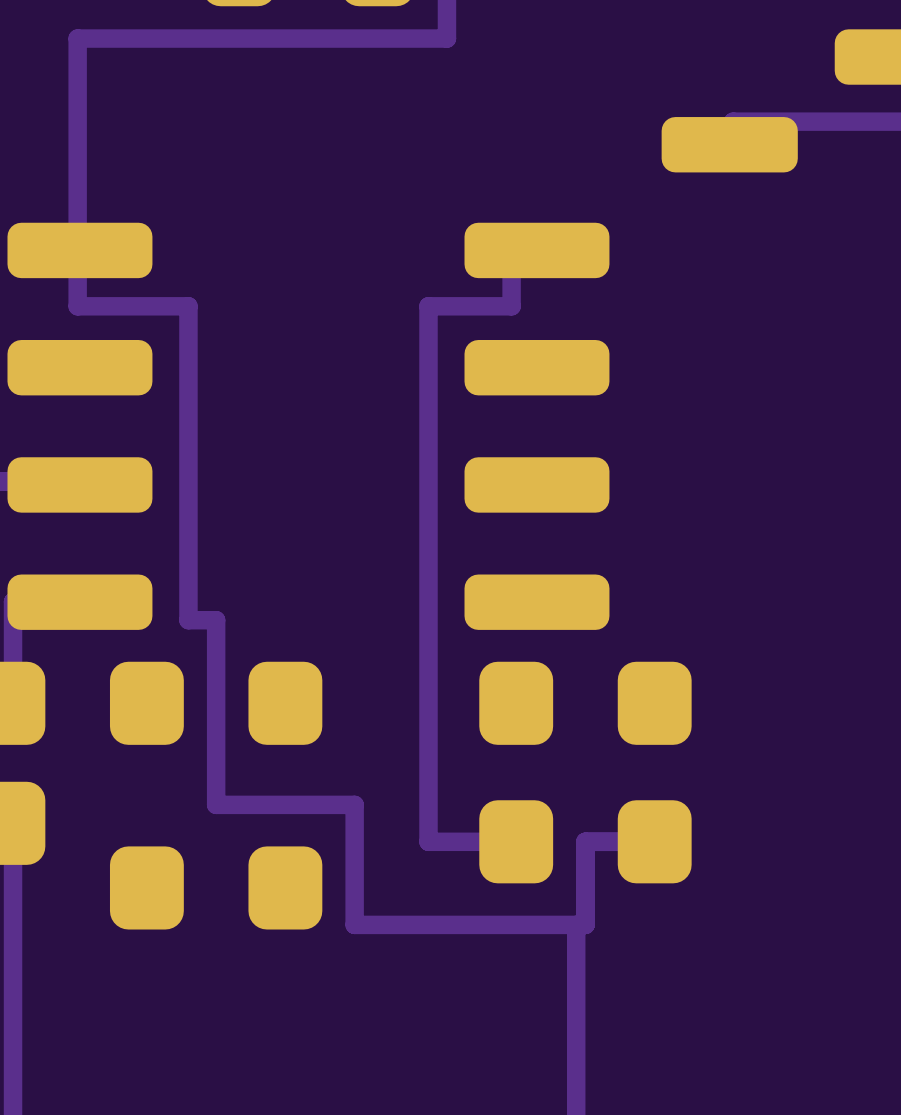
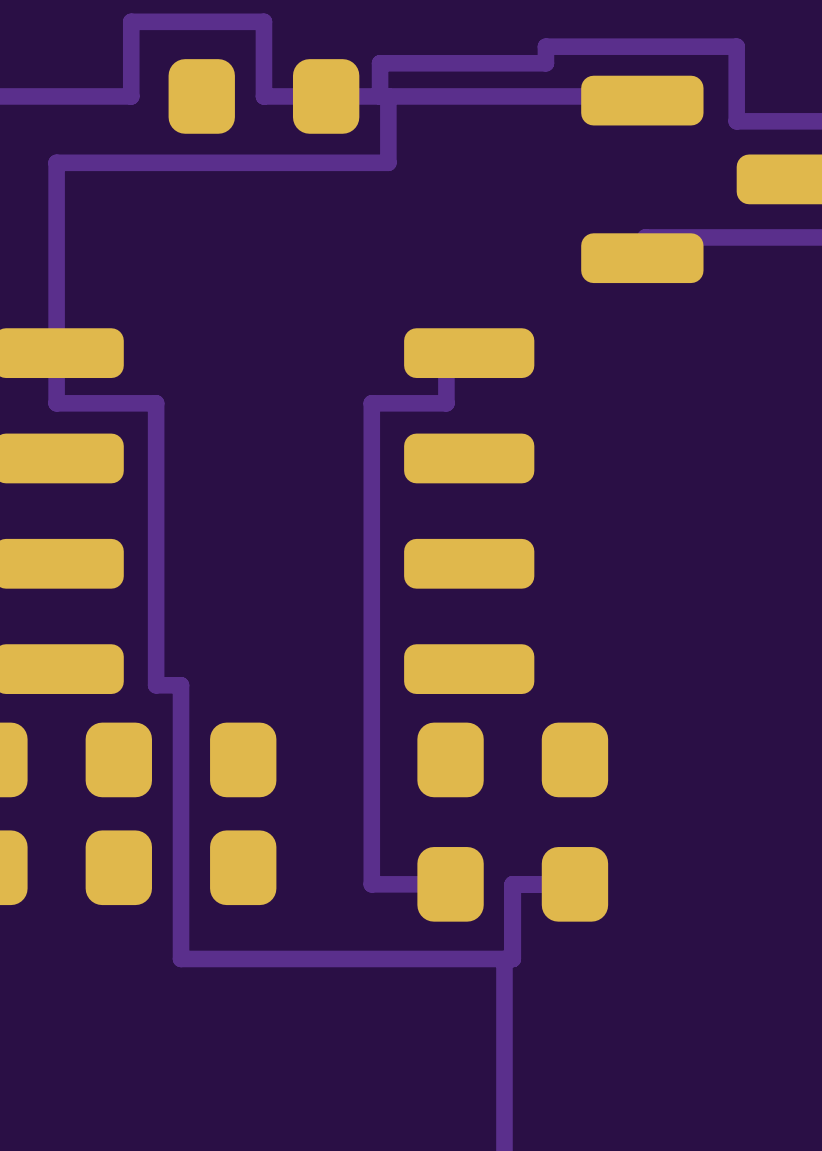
track: (216, 804) (354, 804) (354, 924) -> (181, 851) (181, 958) (305, 958)
part position: (216, 887) -> (181, 867)

